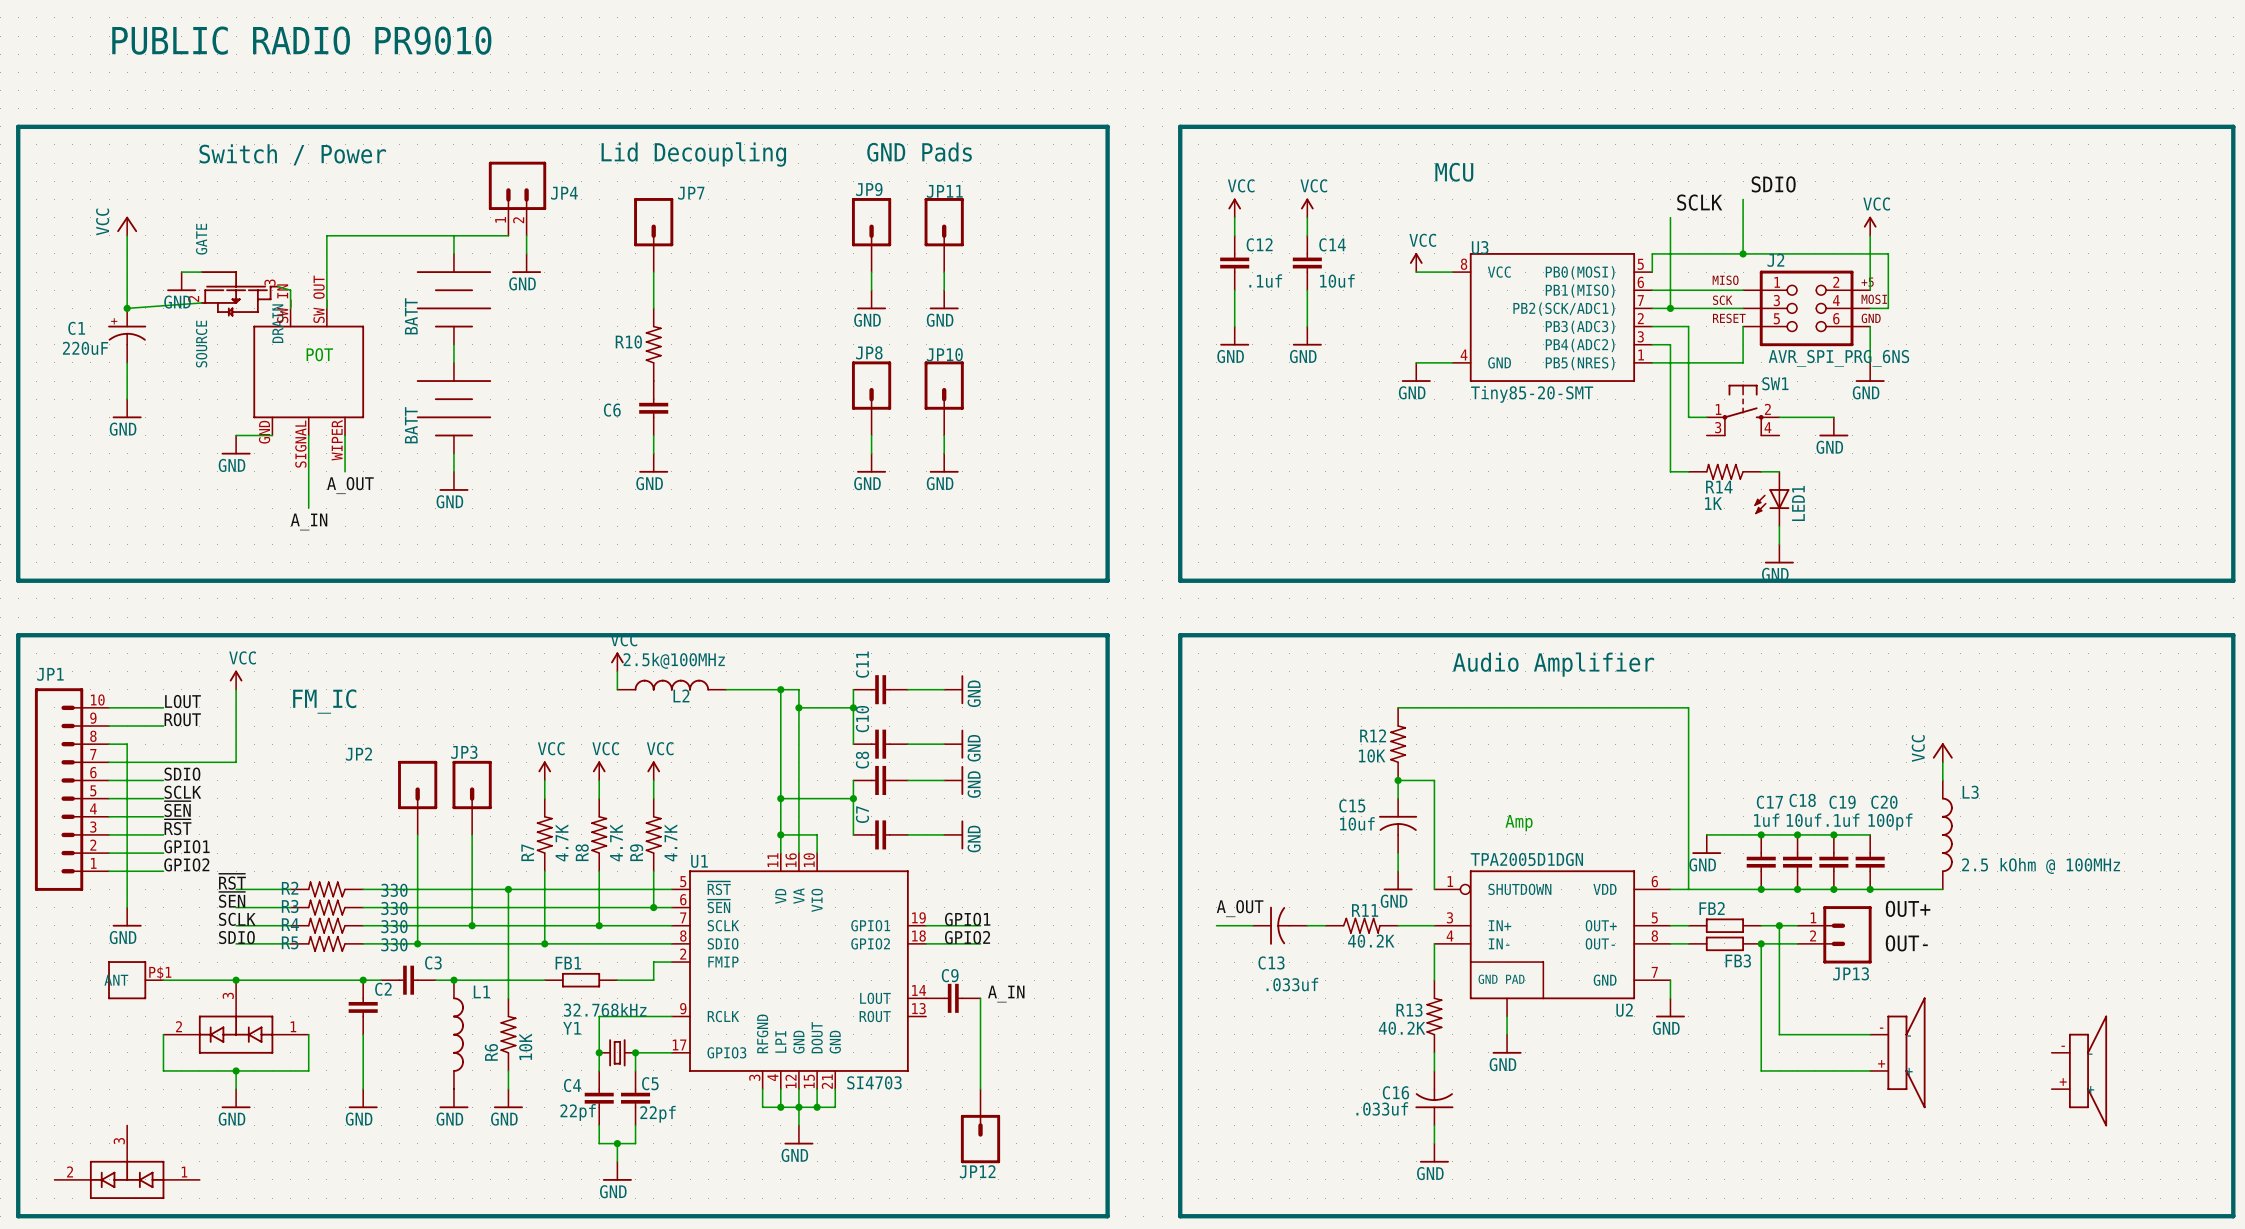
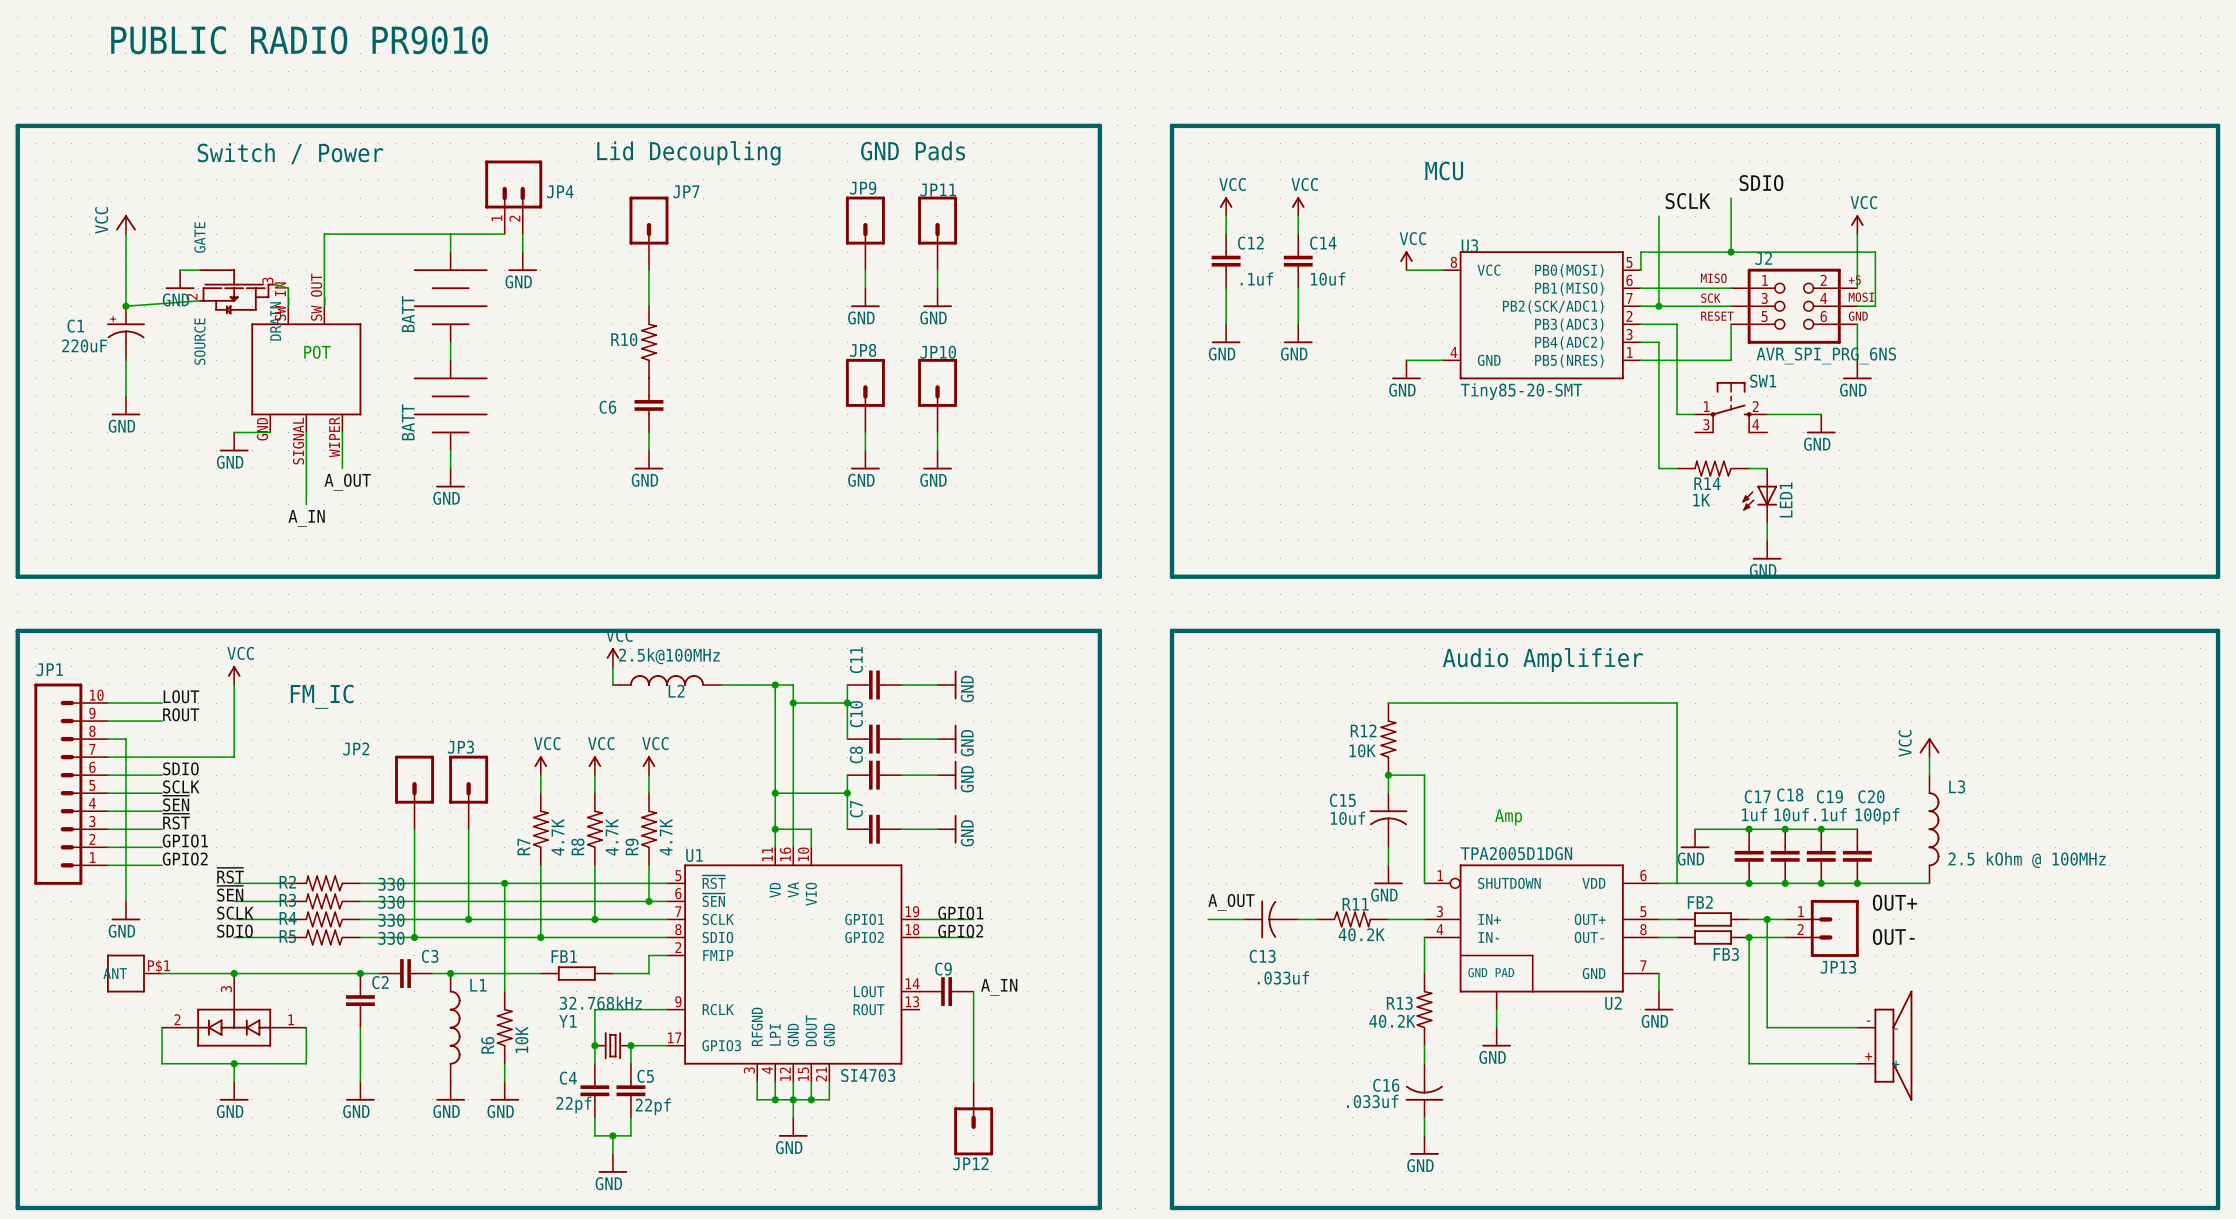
part: (2079, 1070) -> none
part: (127, 1162) -> none

